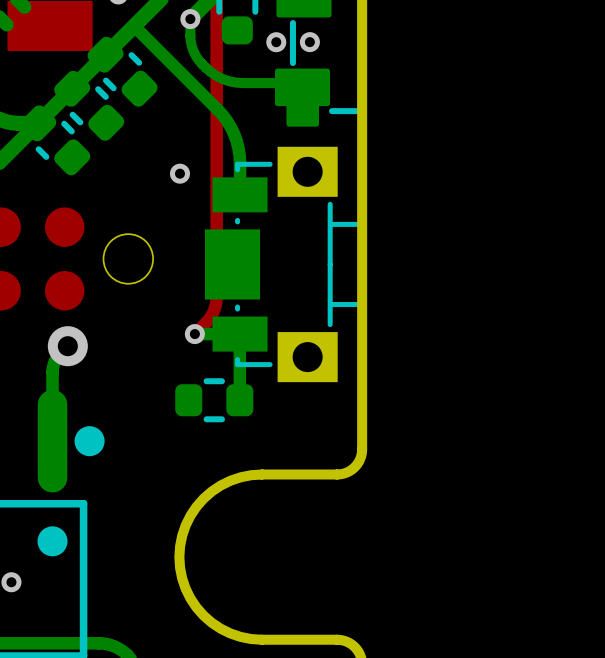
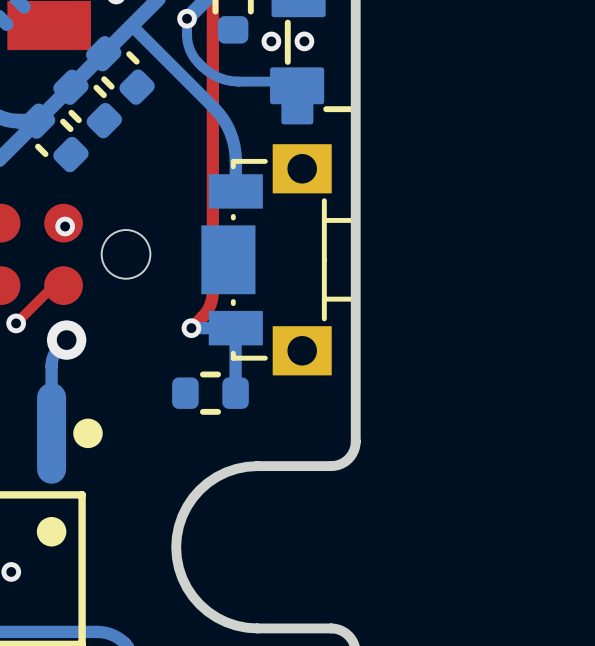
via: (179, 173) -> none
via: none -> (65, 226)
top track: none -> (50, 289) (16, 323)
via: none -> (16, 323)

